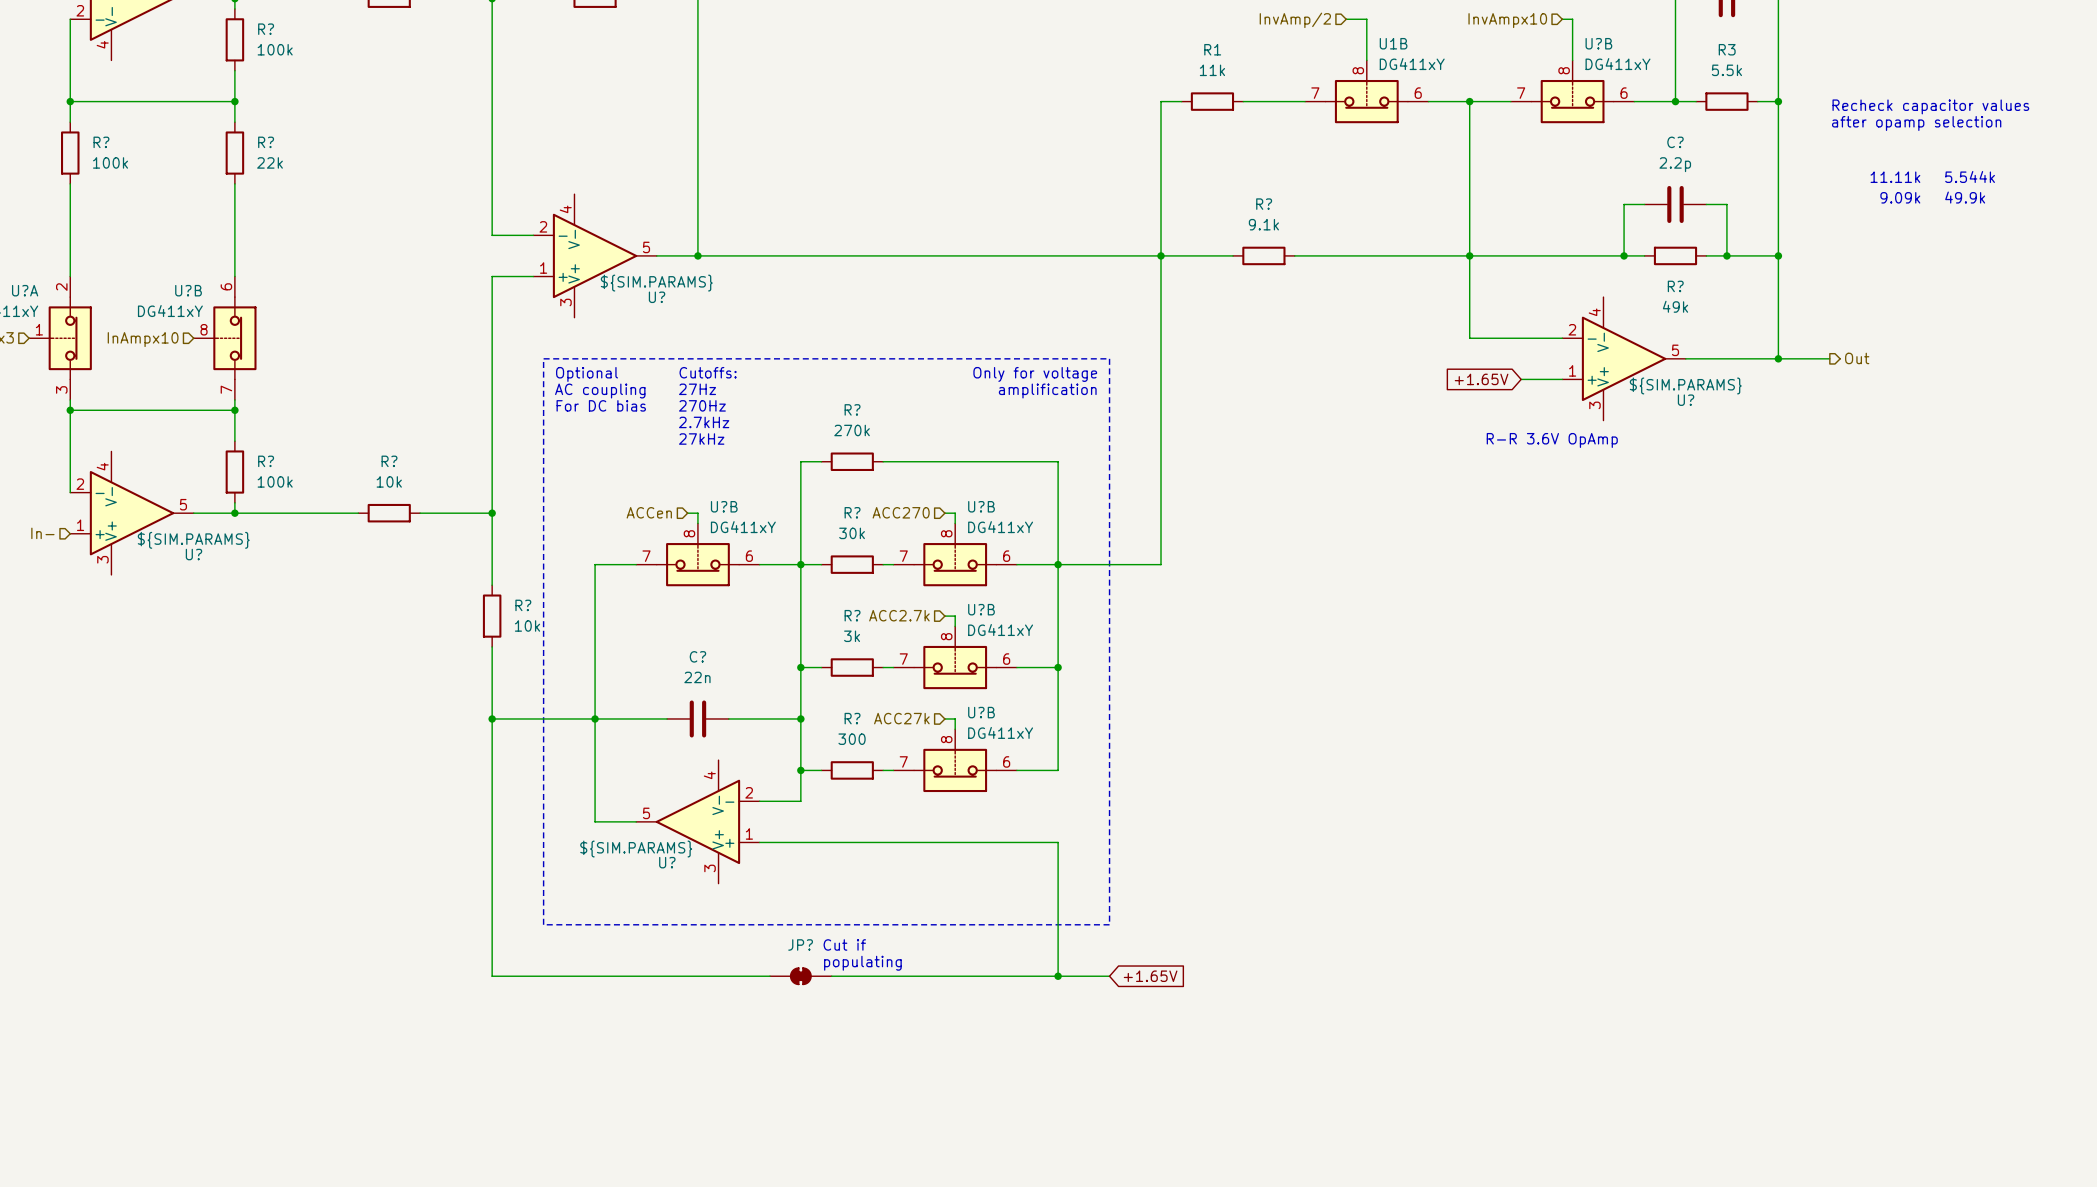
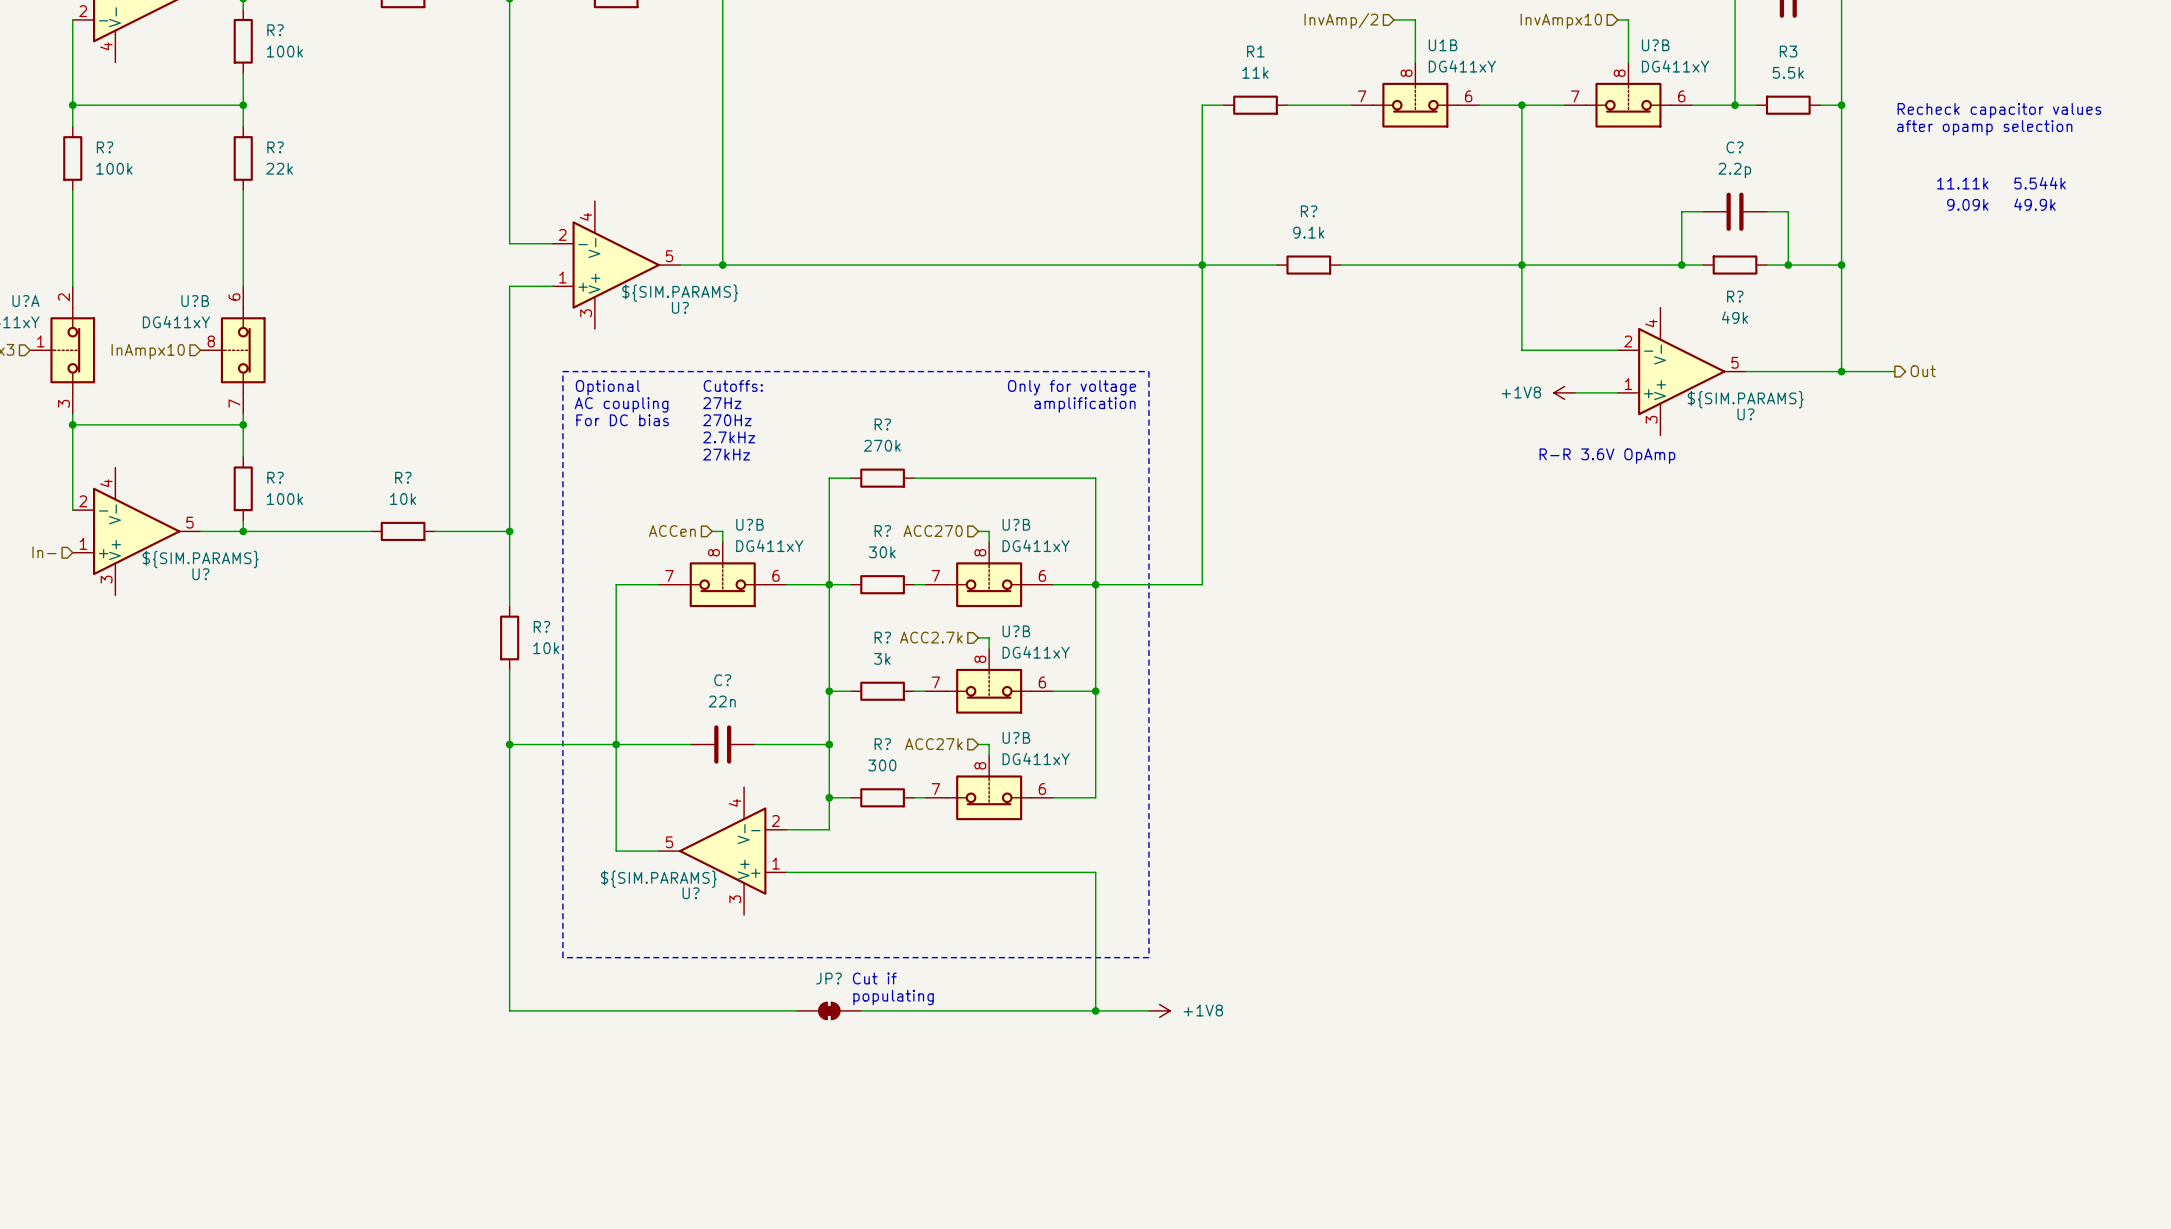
global label: +1.65V (1481, 379) -> none
power symbol: none -> +1V8 (1564, 392)
power symbol: none -> +1V8 (1159, 1010)
global label: +1.65V (1150, 976) -> none

